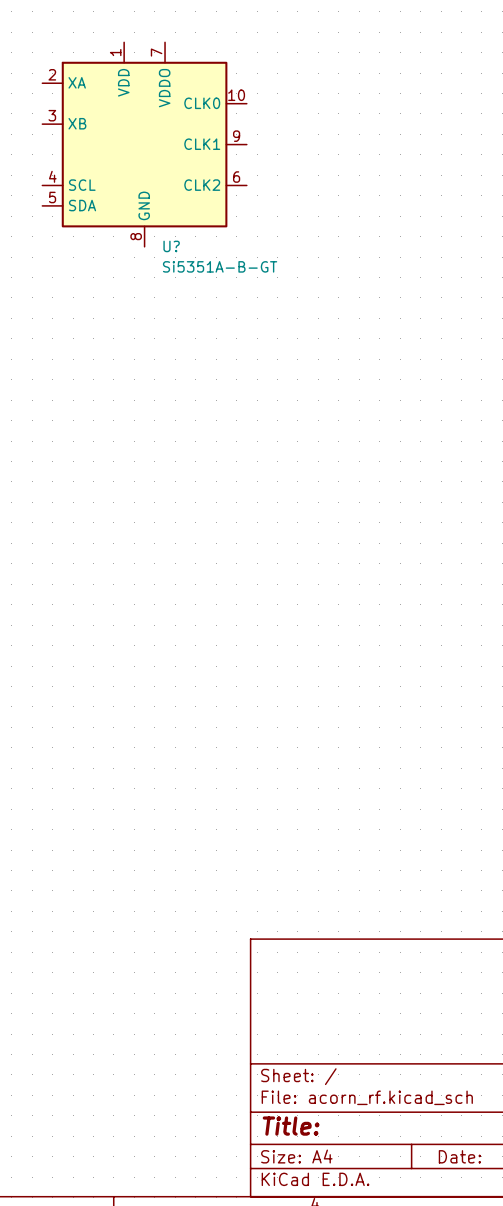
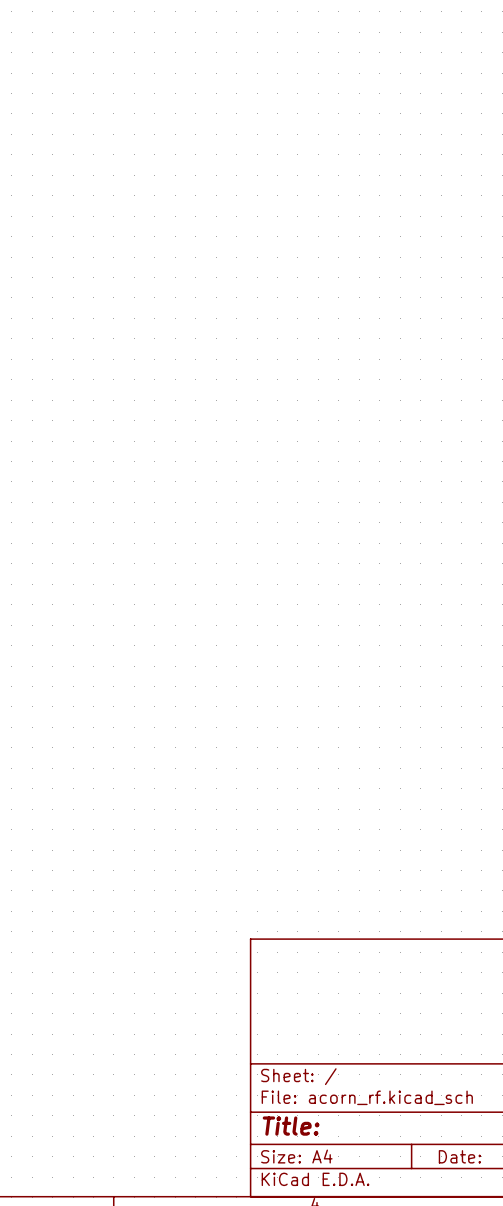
U?: Si5351A-B-GT (144, 144) -> none

